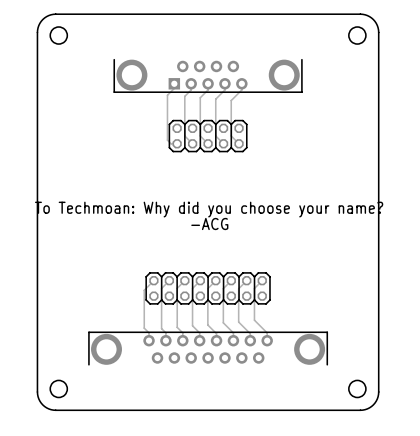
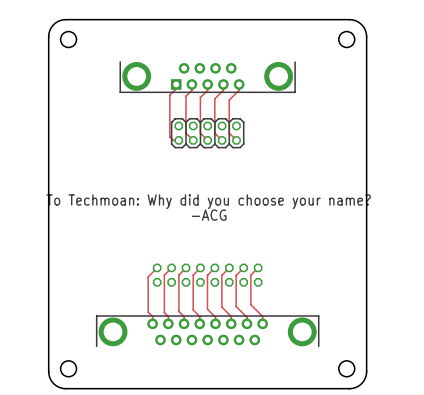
part side: top (208, 288) -> bottom (207, 275)

